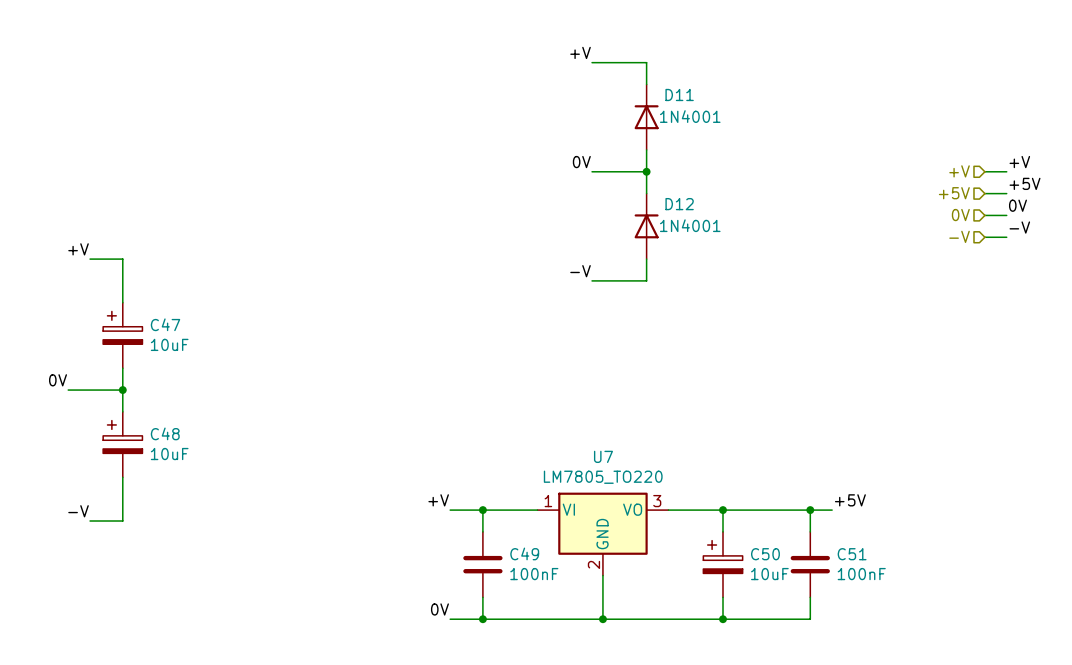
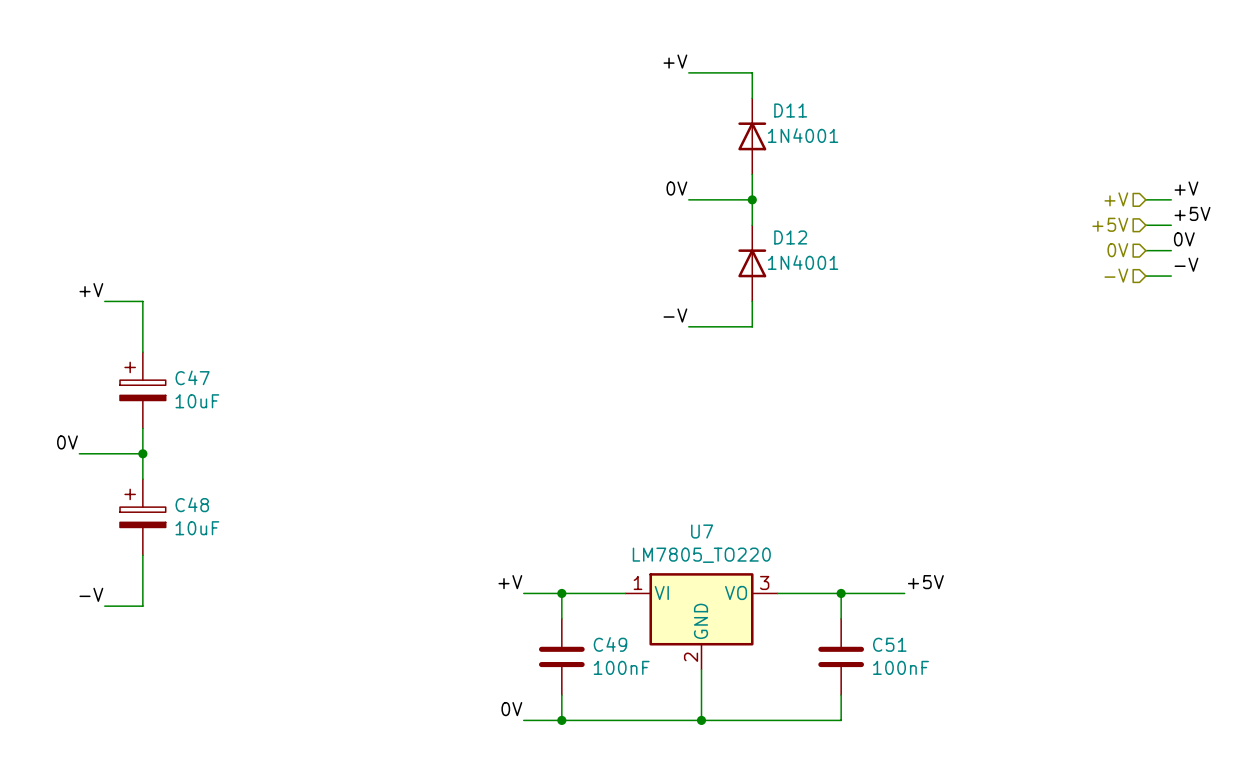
label position: +5V (850, 500) -> +5V (925, 582)
wire: (777, 510) (832, 510) -> none
wire: (810, 510) (810, 531) -> none
junction: (810, 510) -> none
C50: 10uF (722, 564) -> none
C51 position: (810, 564) -> (841, 656)
wire: (810, 597) (810, 619) (722, 619) -> none
junction: (722, 619) -> none

